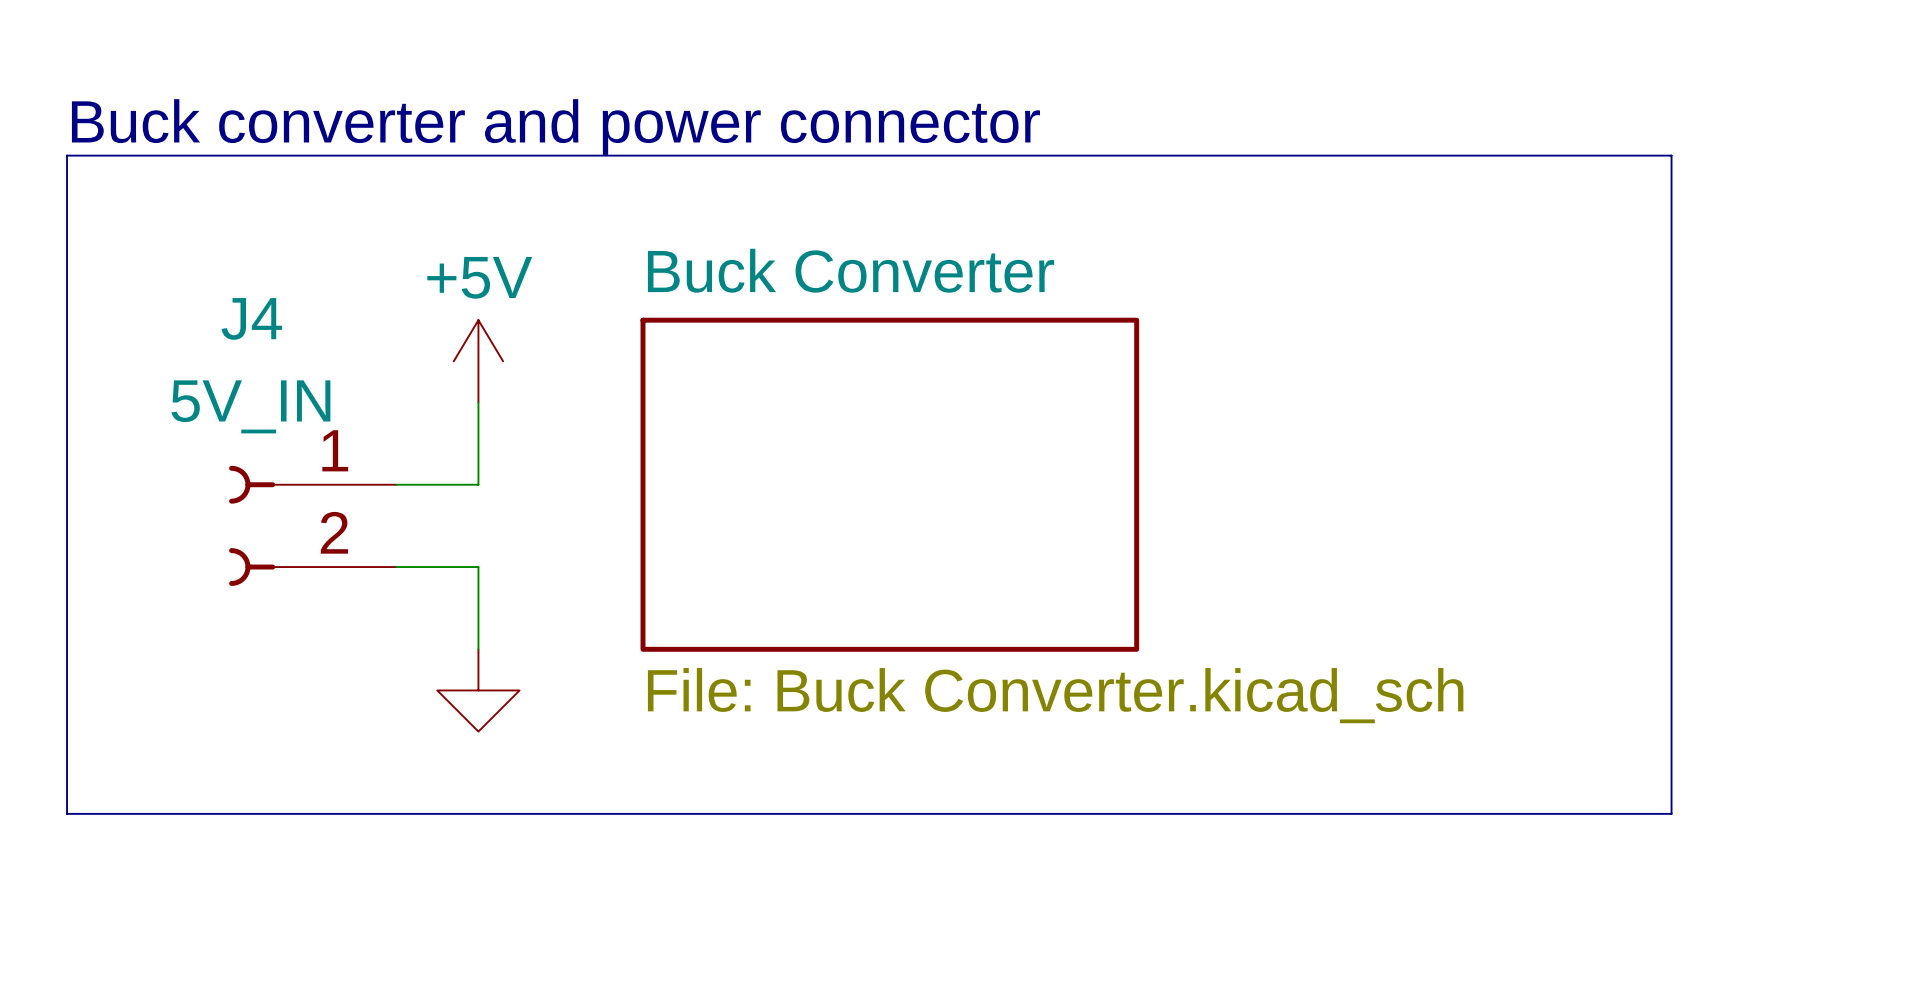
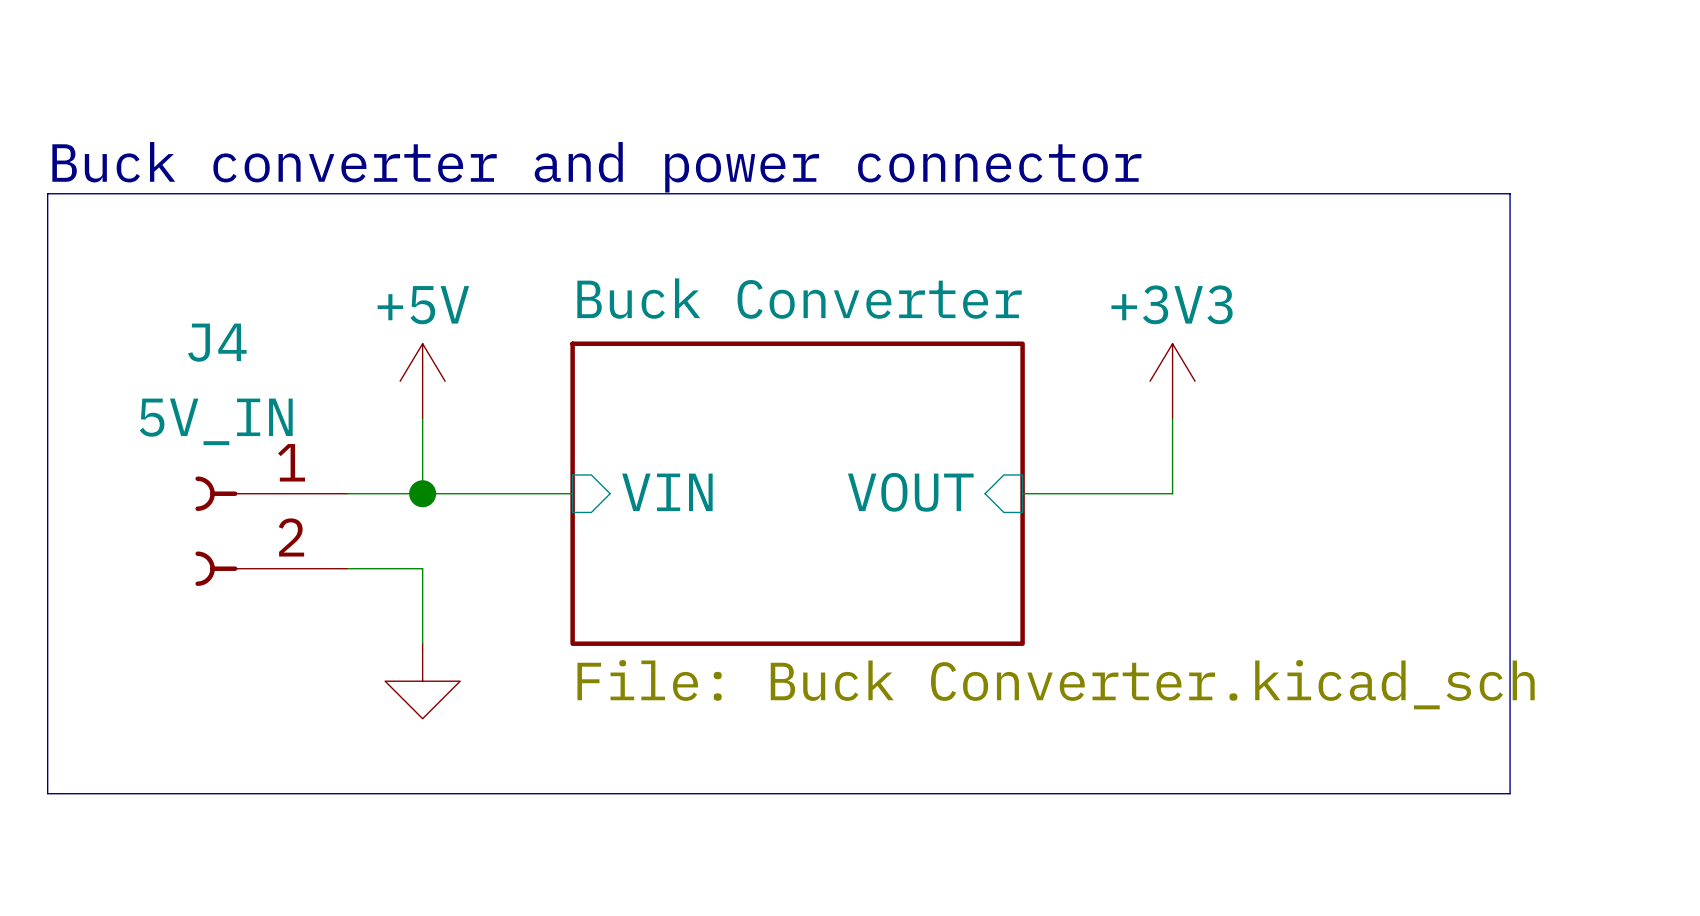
power symbol: none -> +3V3 (1172, 381)
wire: none -> (1172, 418) (1172, 493) (1022, 493)
sheet pin: none -> VIN (667, 492)
sheet pin: none -> VOUT (910, 492)
wire: none -> (422, 493) (572, 493)
junction: none -> (422, 493)

